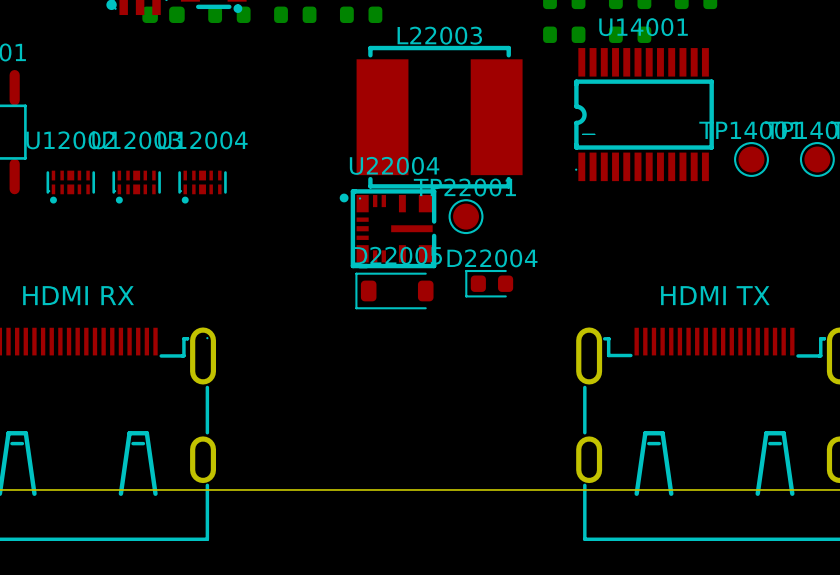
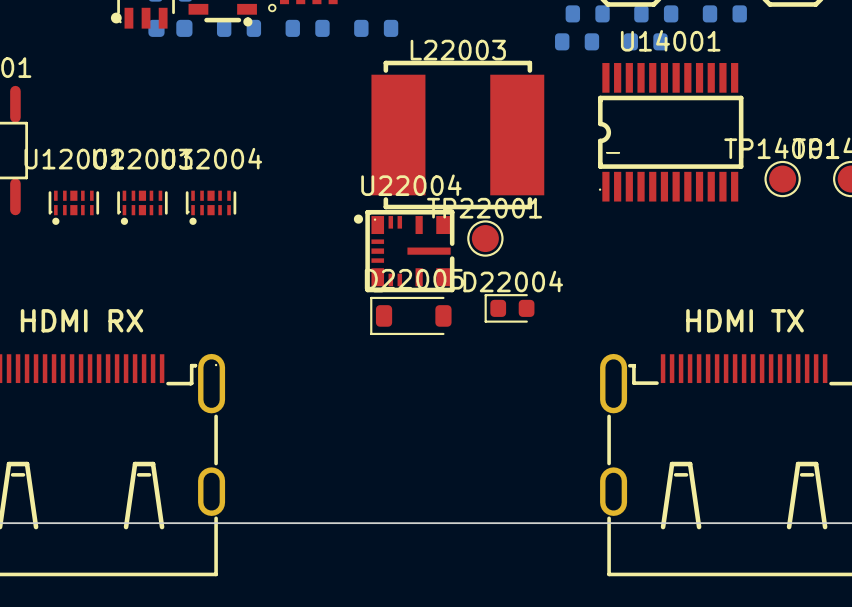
part position: (564, 34) -> (577, 41)
part position: (630, 34) -> (645, 41)

